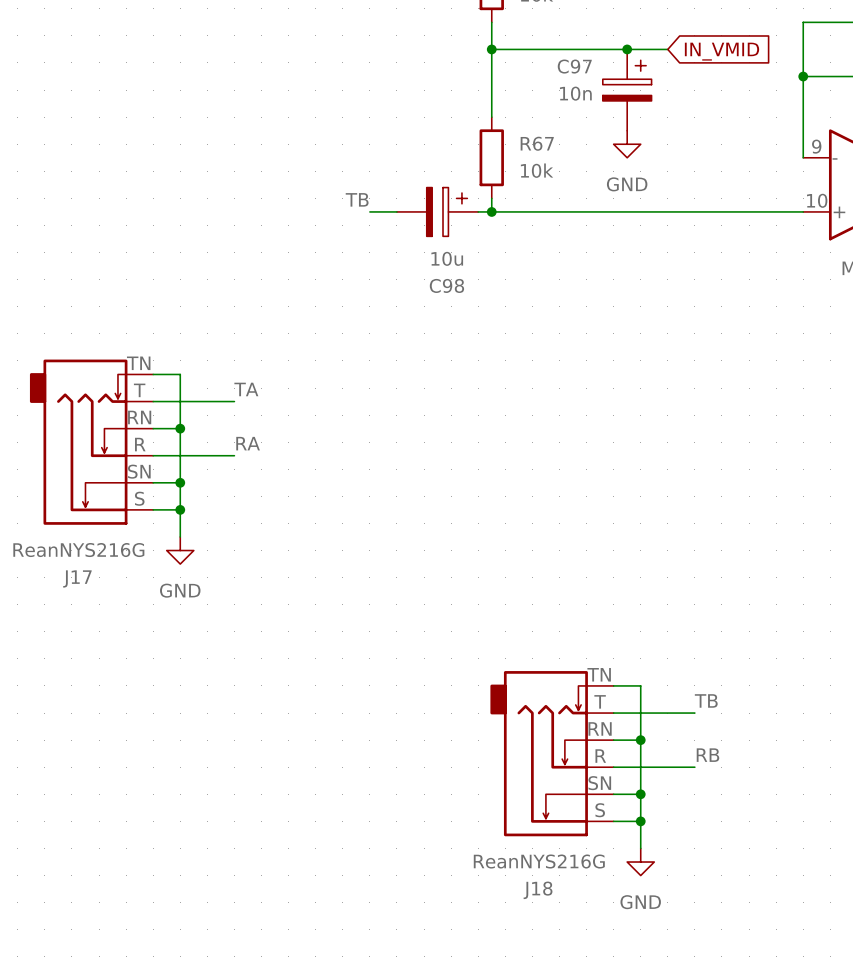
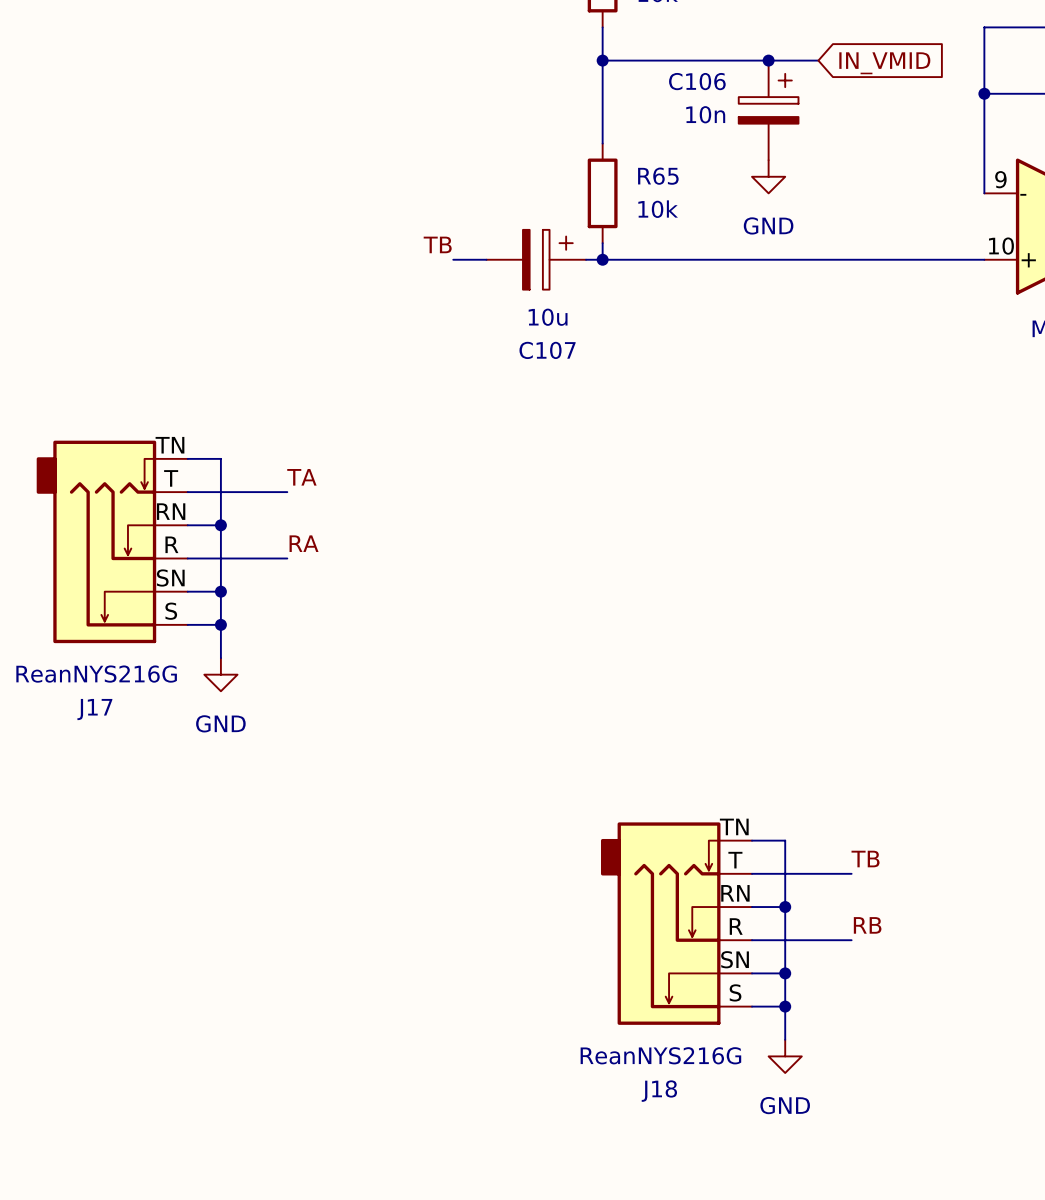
C97 name: C97 (574, 66) -> C106 (697, 81)
R67 name: R67 (537, 143) -> R65 (658, 176)
C98 name: C98 (446, 285) -> C107 (547, 350)

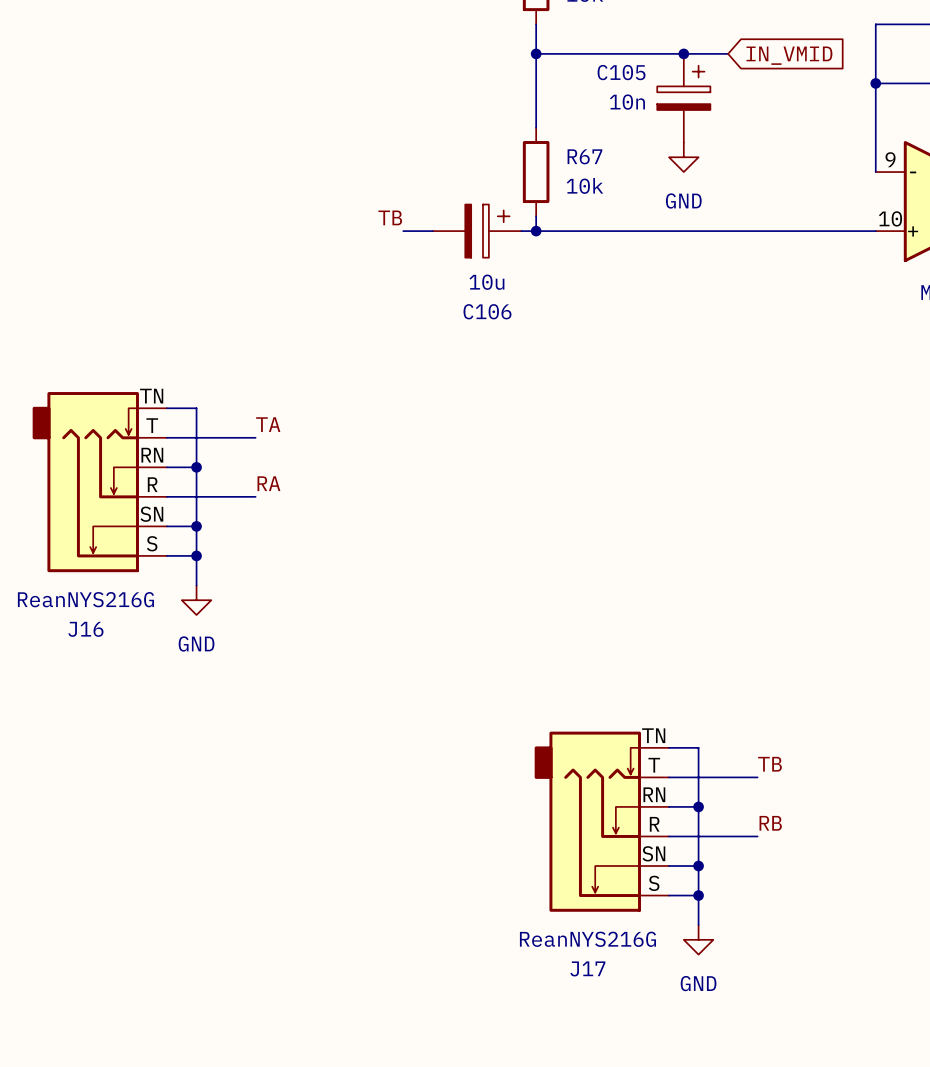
C106 name: C106 (697, 81) -> C105 (621, 72)
R65 name: R65 (658, 176) -> R67 (584, 156)
C107 name: C107 (547, 350) -> C106 (487, 311)
J17 name: J17 (94, 709) -> J16 (85, 629)
J18 name: J18 (659, 1091) -> J17 (587, 968)

